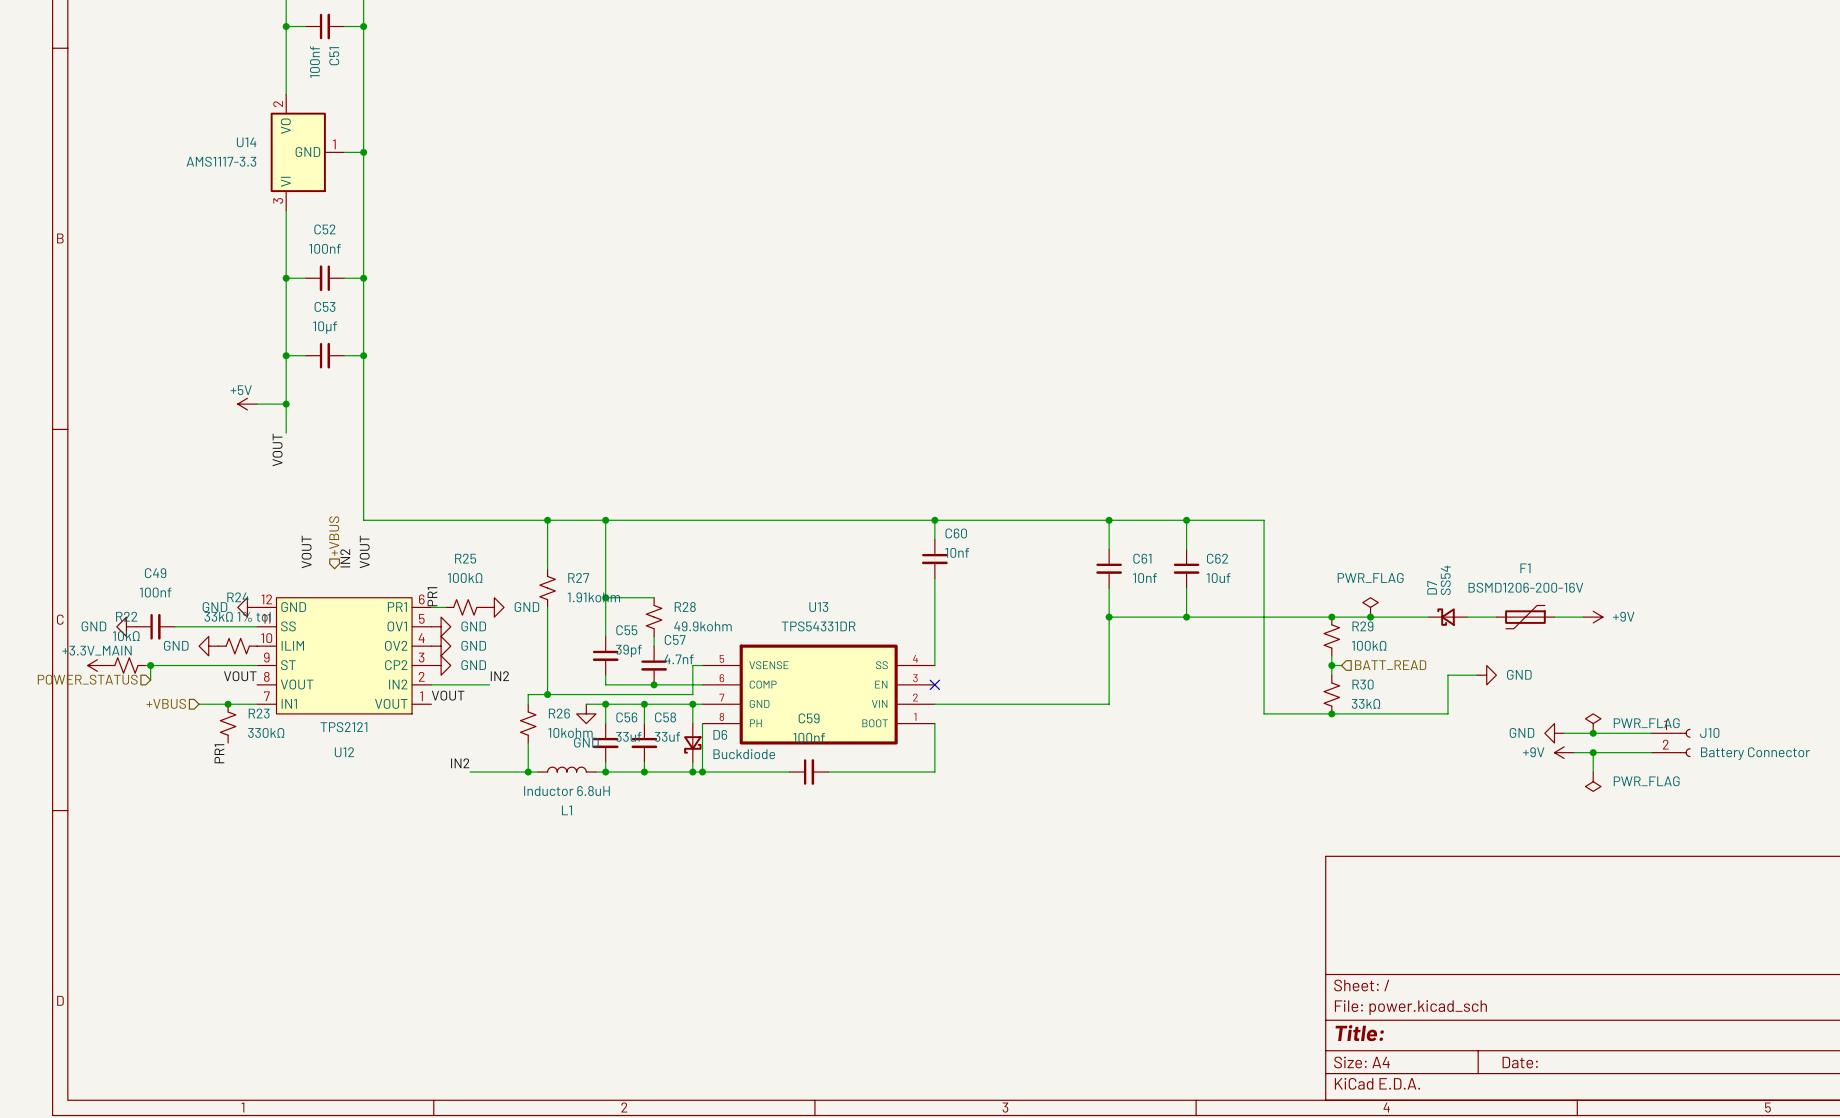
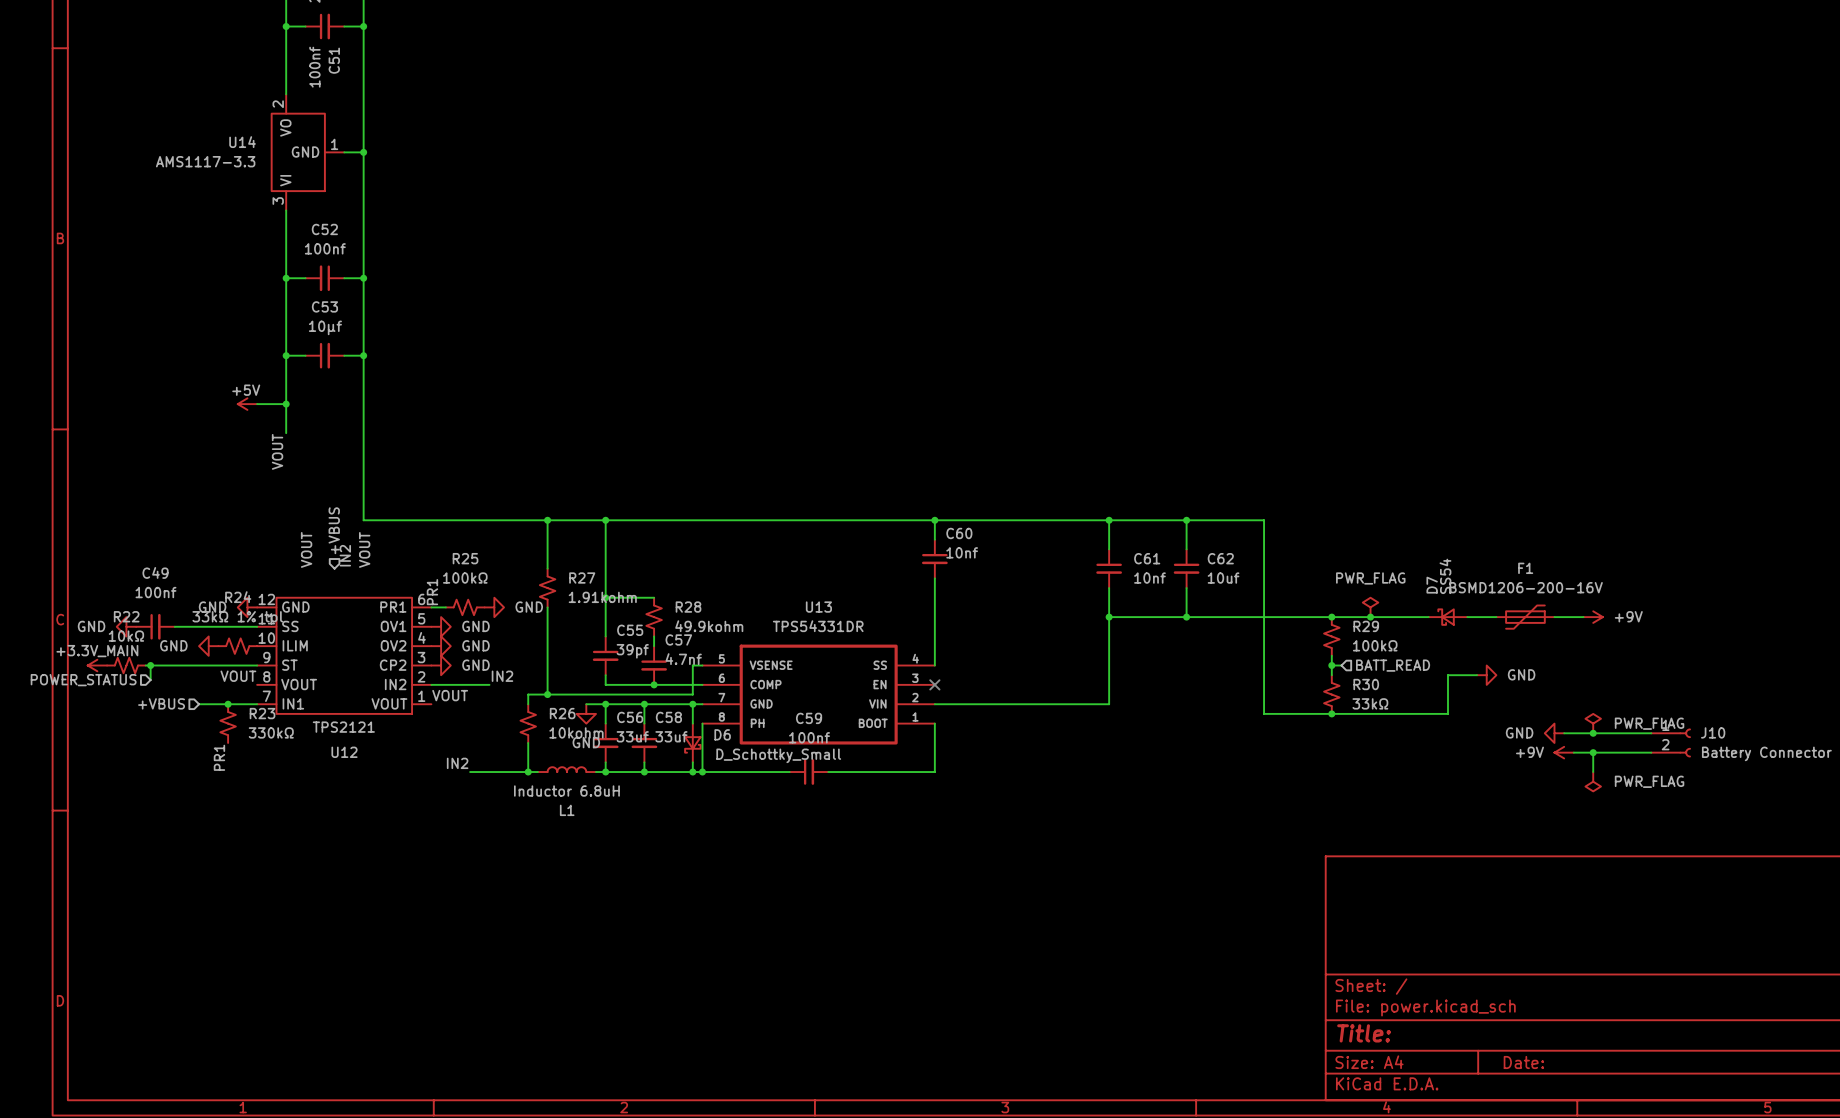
D6 value: Buckdiode (744, 754) -> D_Schottky_Small (778, 755)

